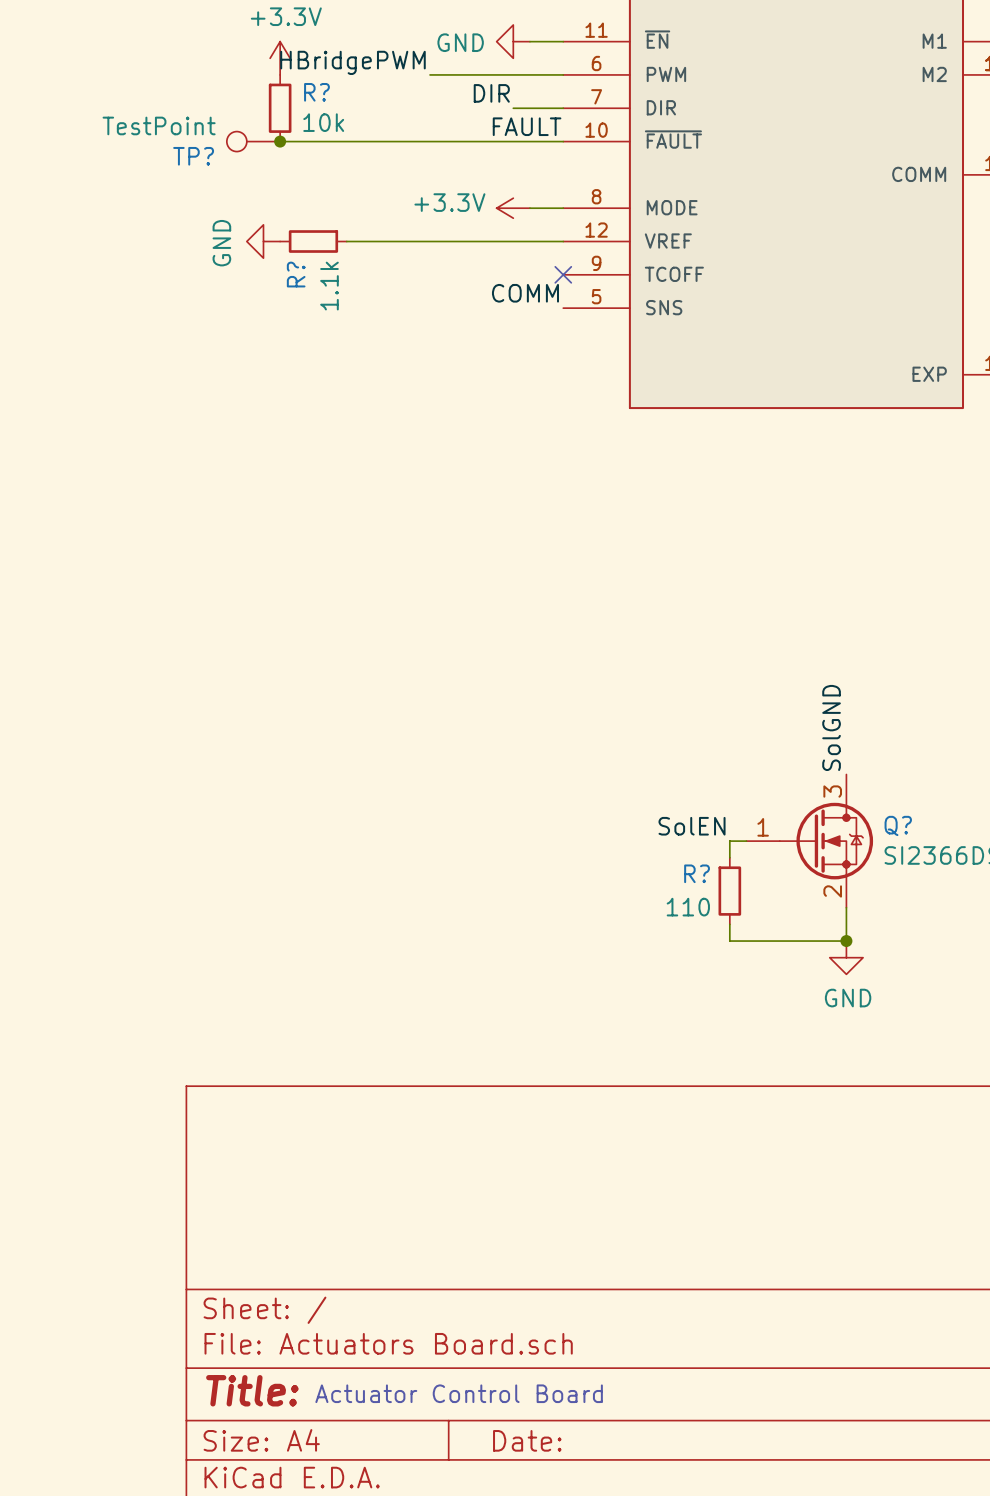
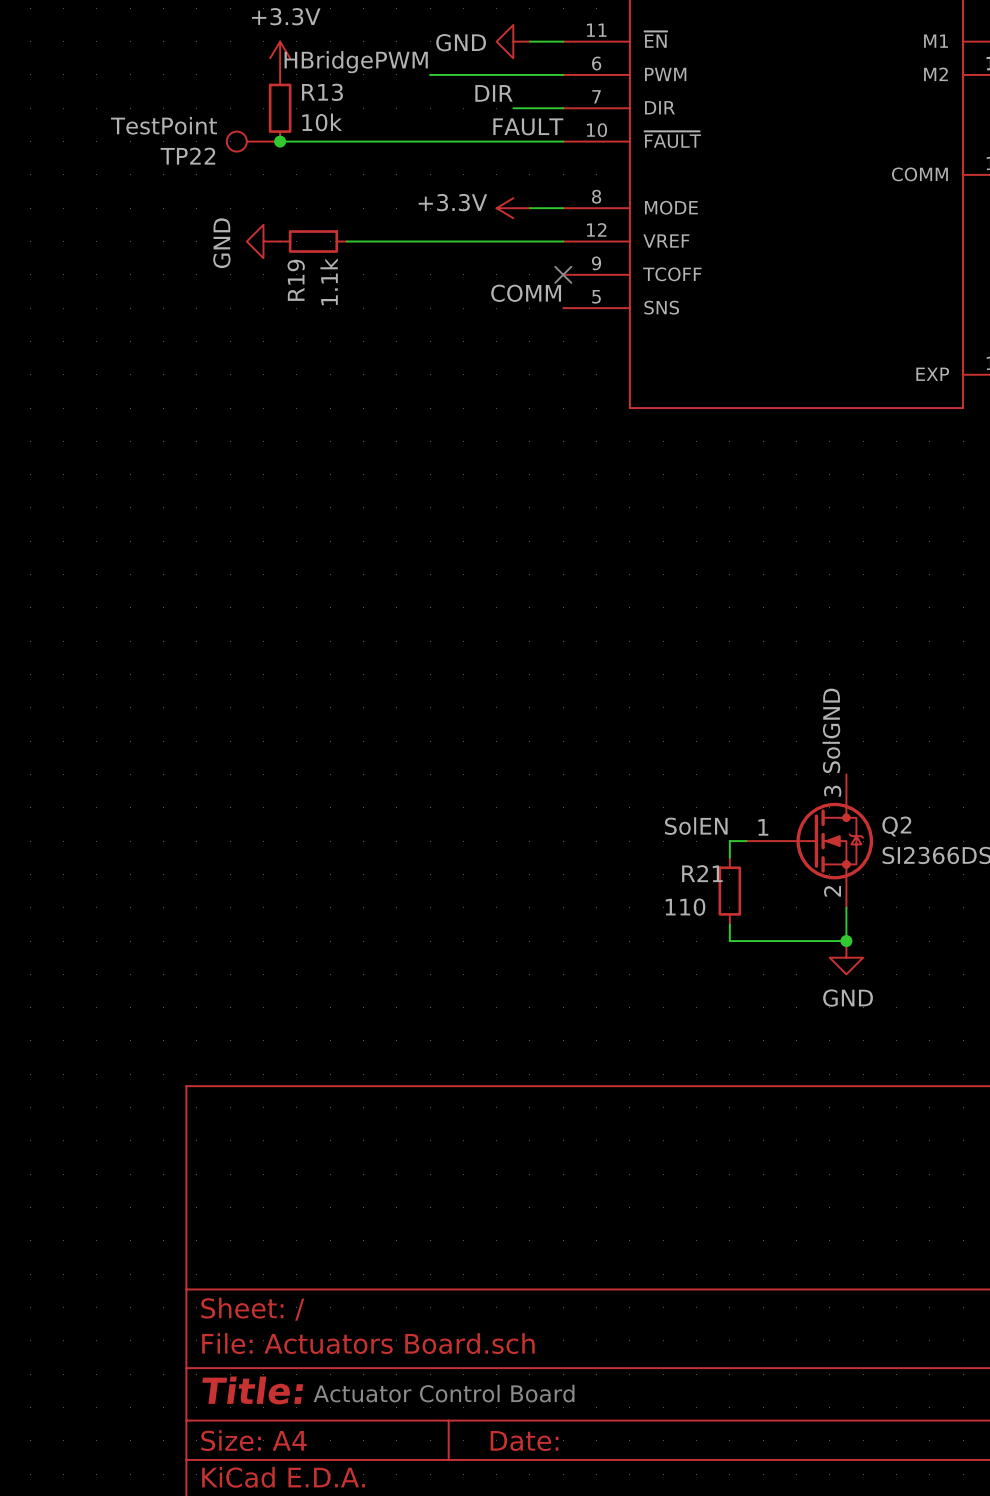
R? name: R? (316, 92) -> R13 (322, 92)
TP? name: TP? (193, 156) -> TP22 (187, 156)
R? name: R? (296, 274) -> R19 (296, 280)
Q? name: Q? (898, 825) -> Q2 (896, 826)
R? name: R? (697, 873) -> R21 (702, 873)

